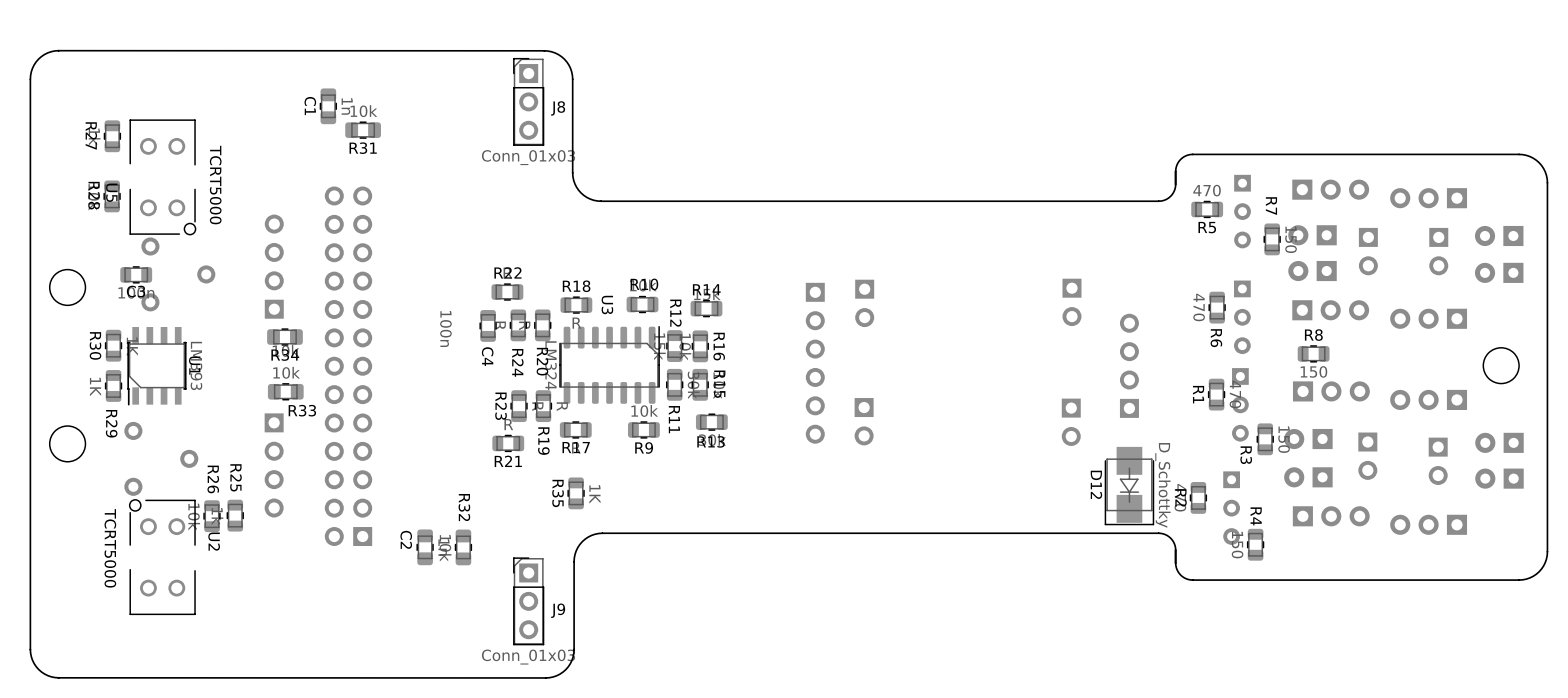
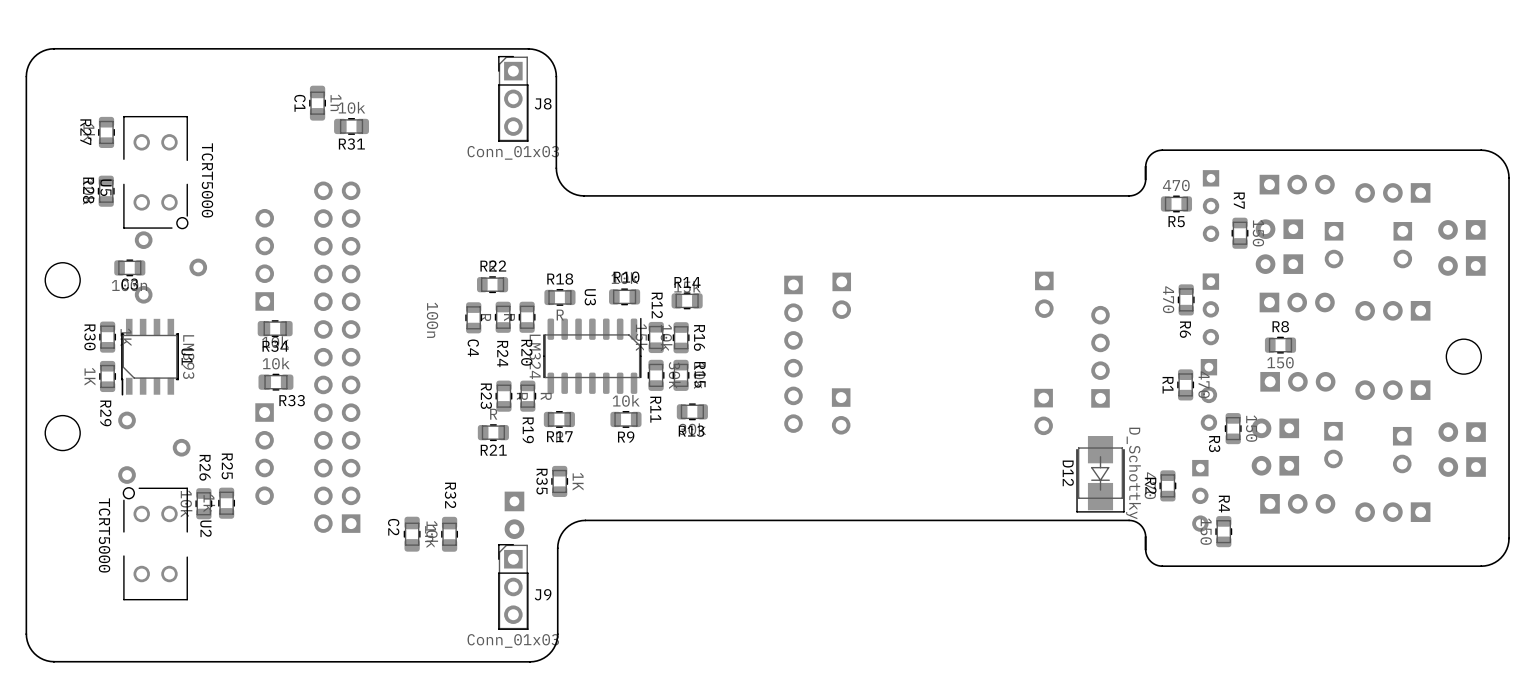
part: none -> (514, 515)

